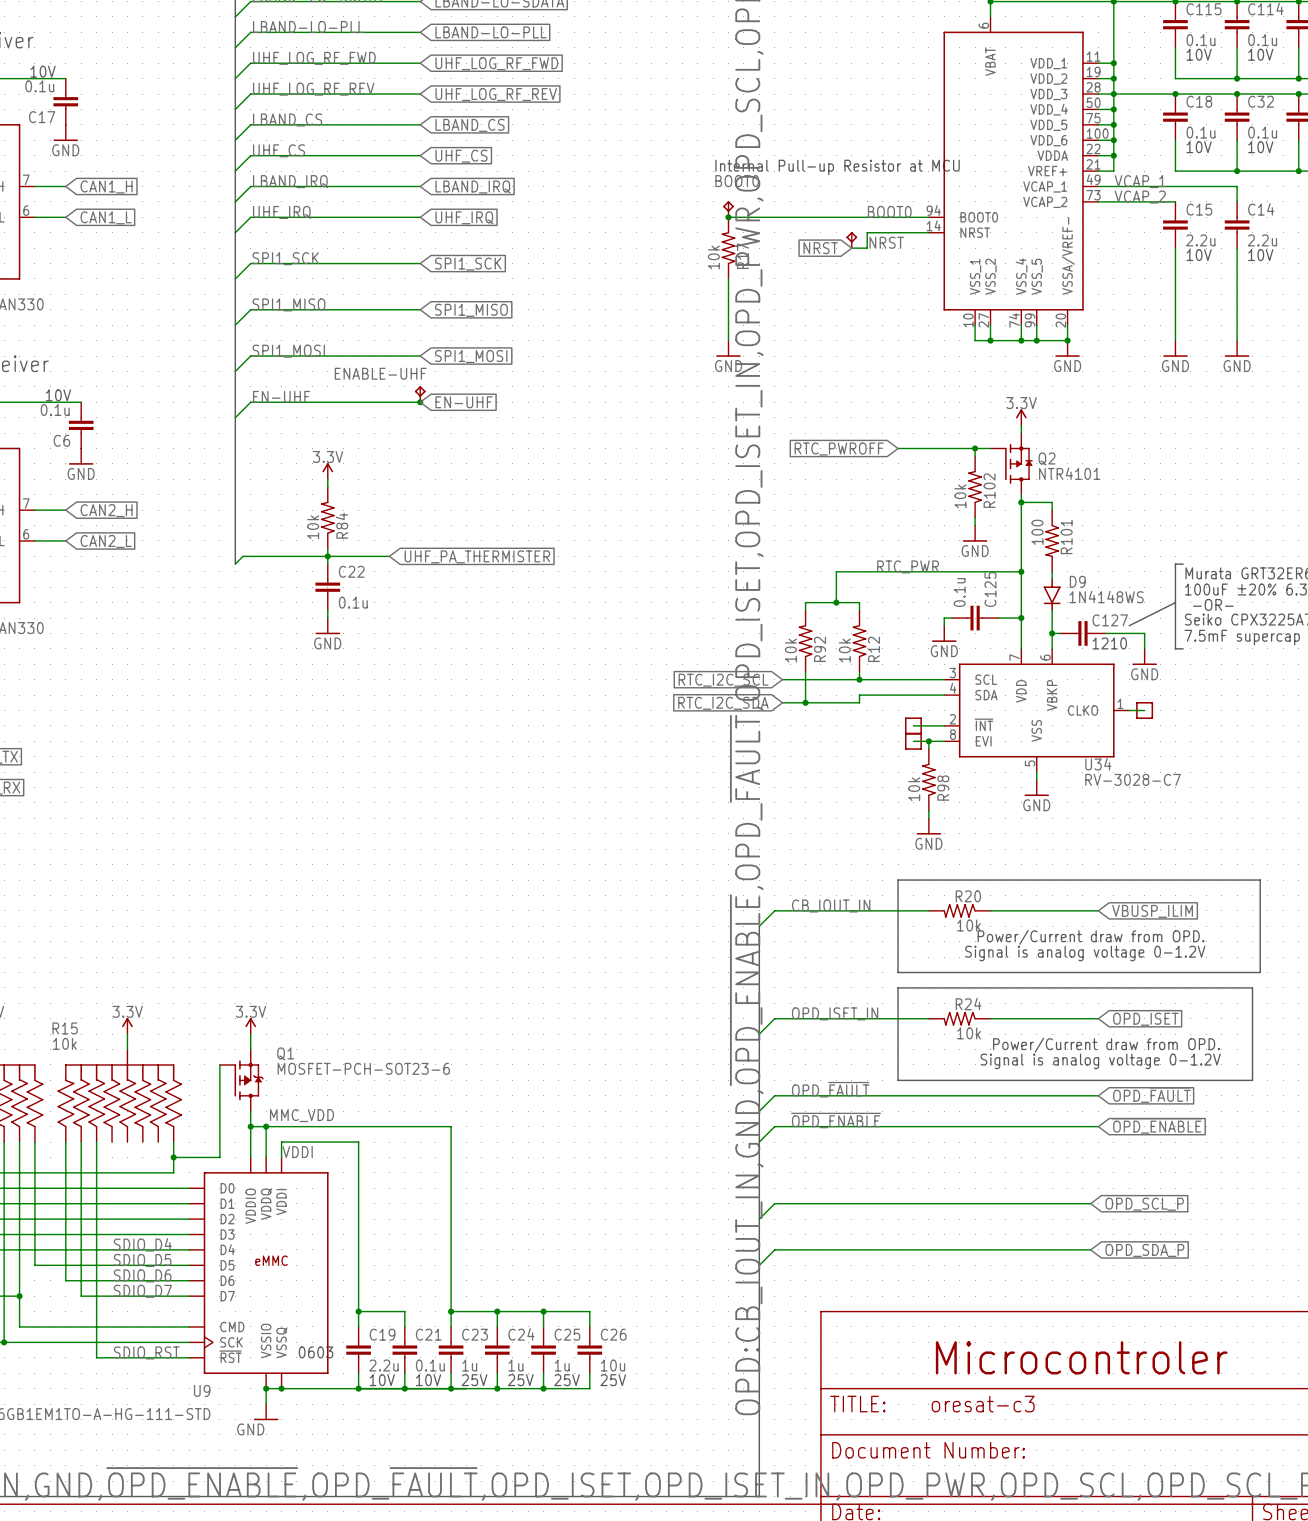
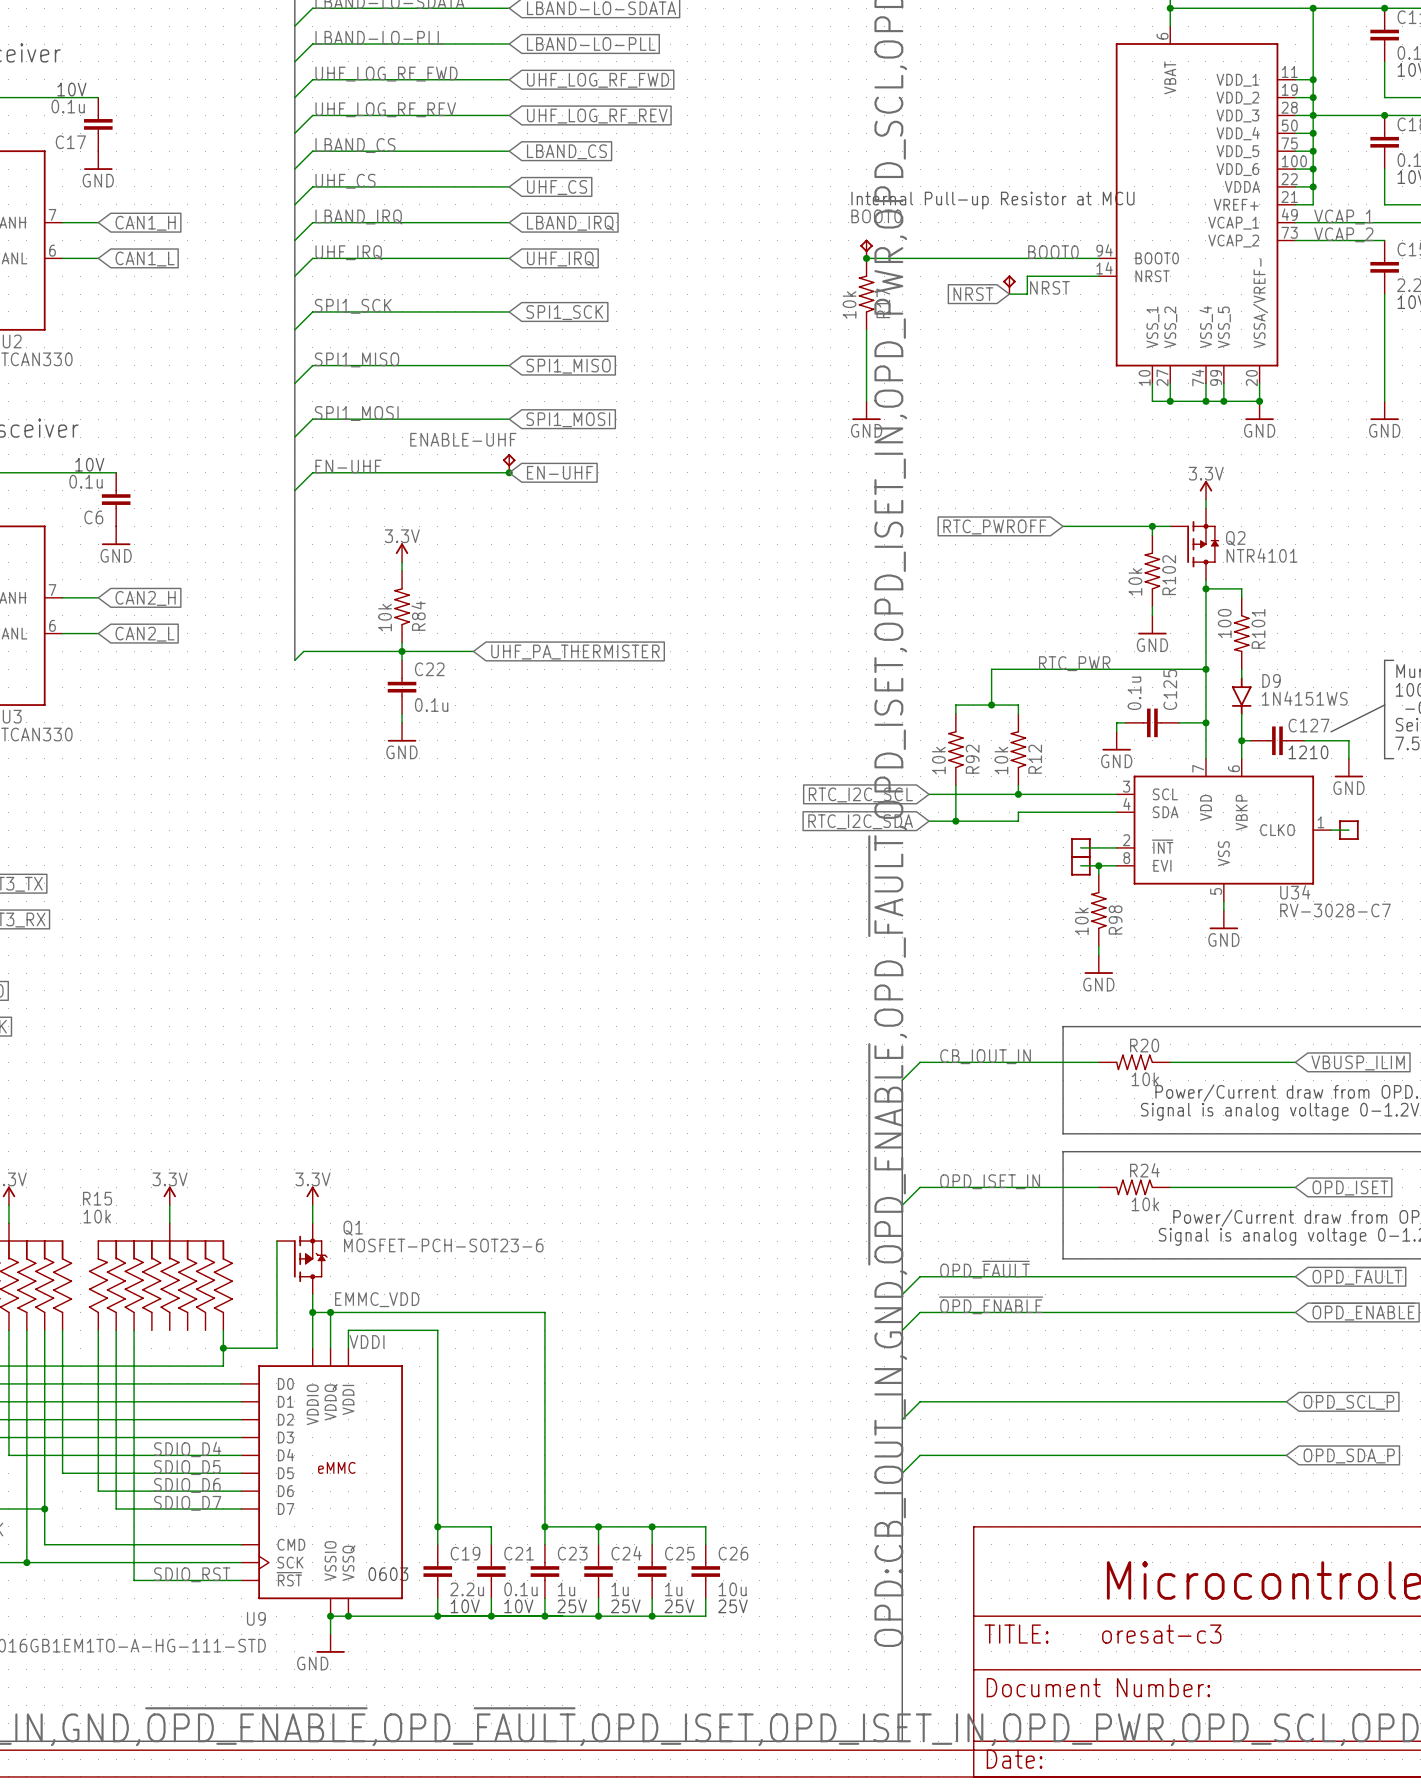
D9 value: 1N4148WS (1106, 596) -> 1N4151WS (1304, 698)
label: MMC_VDD (302, 1115) -> EMMC_VDD (377, 1299)

